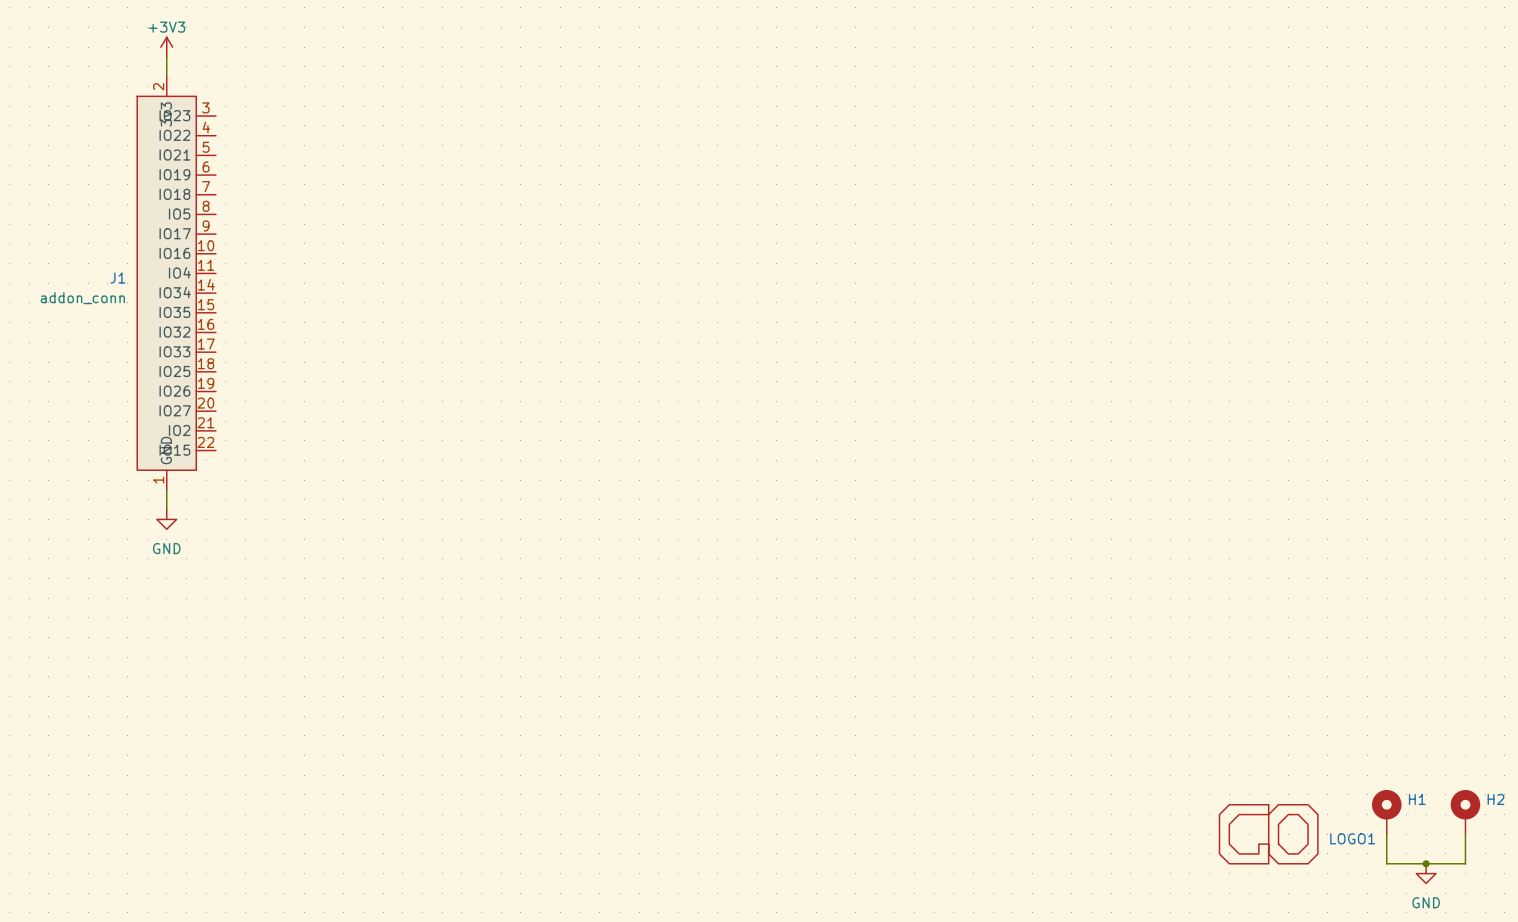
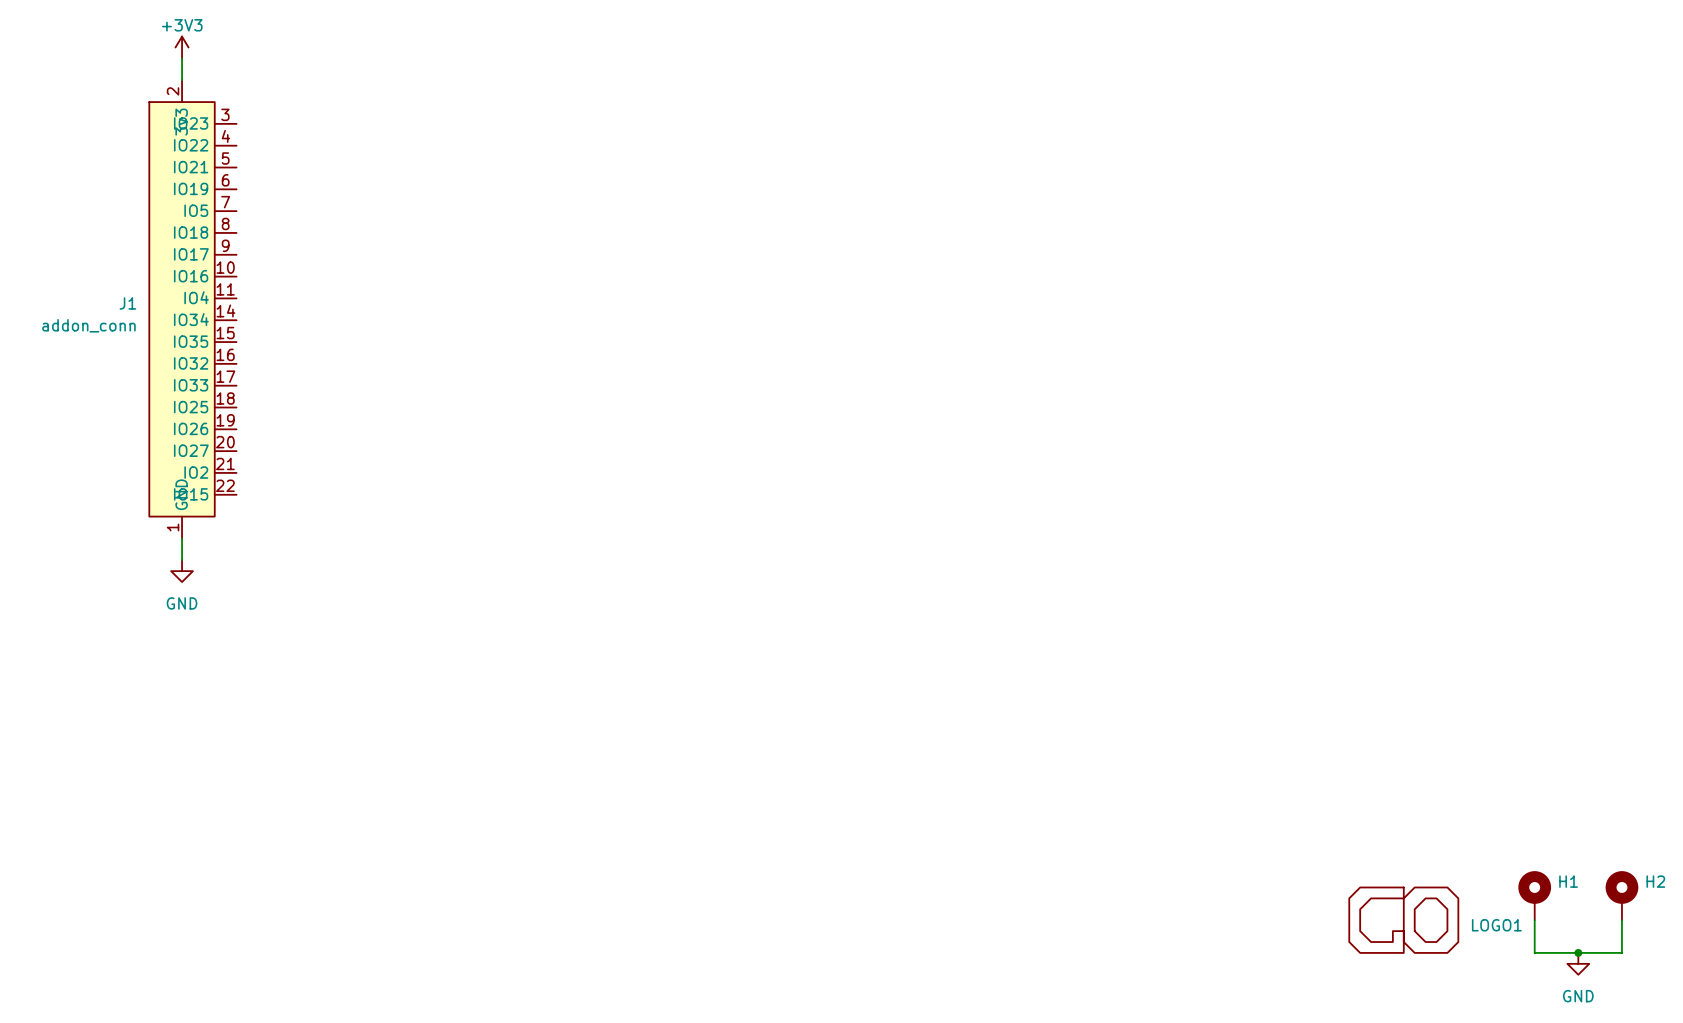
J1 pin name: IO18 (174, 194) -> IO5 (196, 210)
J1 pin name: IO5 (179, 214) -> IO18 (191, 232)

